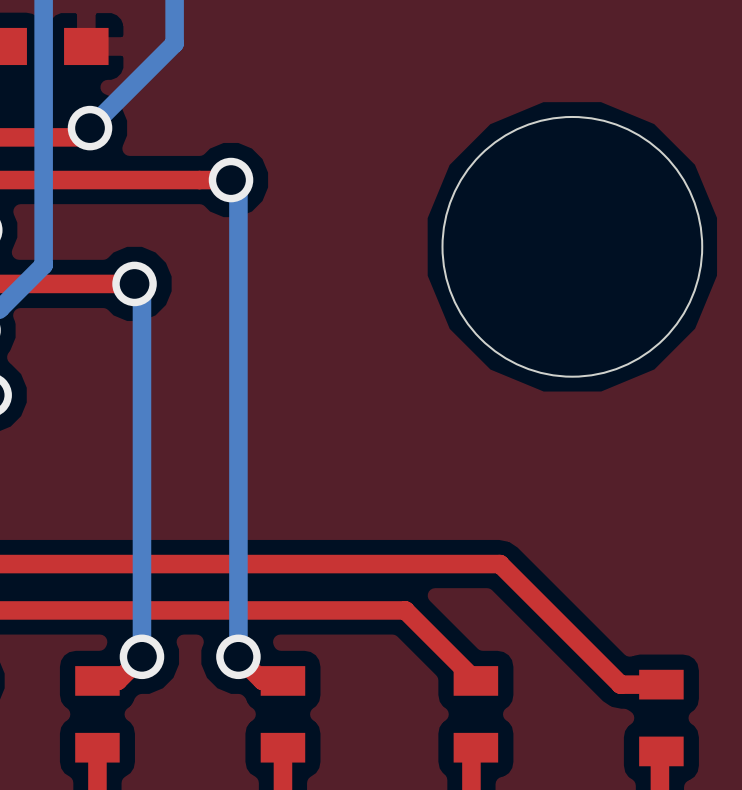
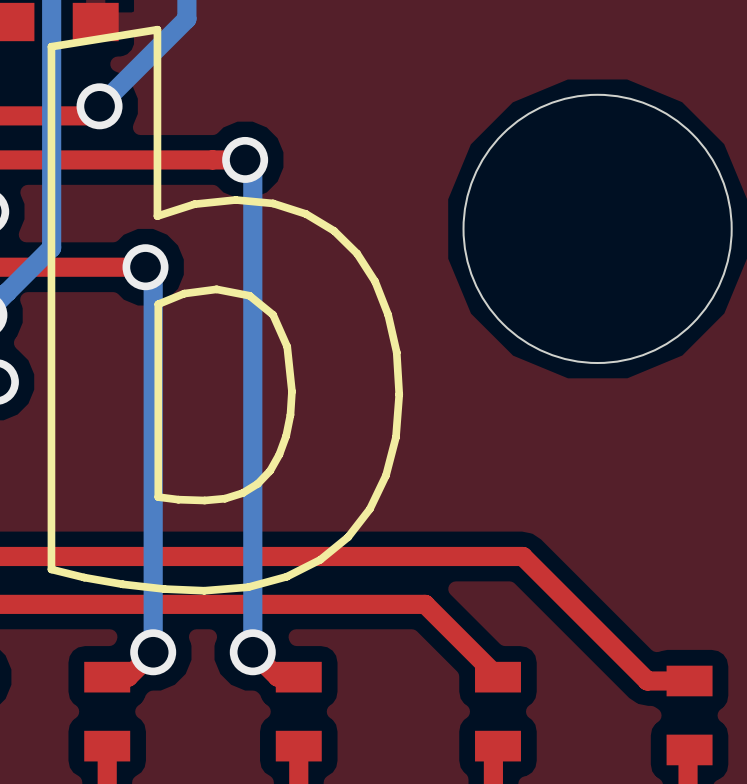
line: none -> (157, 29) (157, 216) (194, 204) (235, 199) (273, 203) (306, 214) (334, 230) (357, 253) (375, 281) (388, 314) (396, 352) (399, 394) (395, 437) (386, 475) (369, 508) (348, 537) (320, 559) (286, 576) (248, 587) (204, 590) (164, 589) (122, 584) (51, 569) (51, 46) (157, 29)
line: none -> (216, 289) (249, 295) (273, 314) (287, 346) (291, 391) (290, 414) (286, 435) (279, 454) (270, 470) (257, 483) (242, 493) (225, 498) (204, 500) (158, 497) (158, 304) (184, 293) (216, 289)

